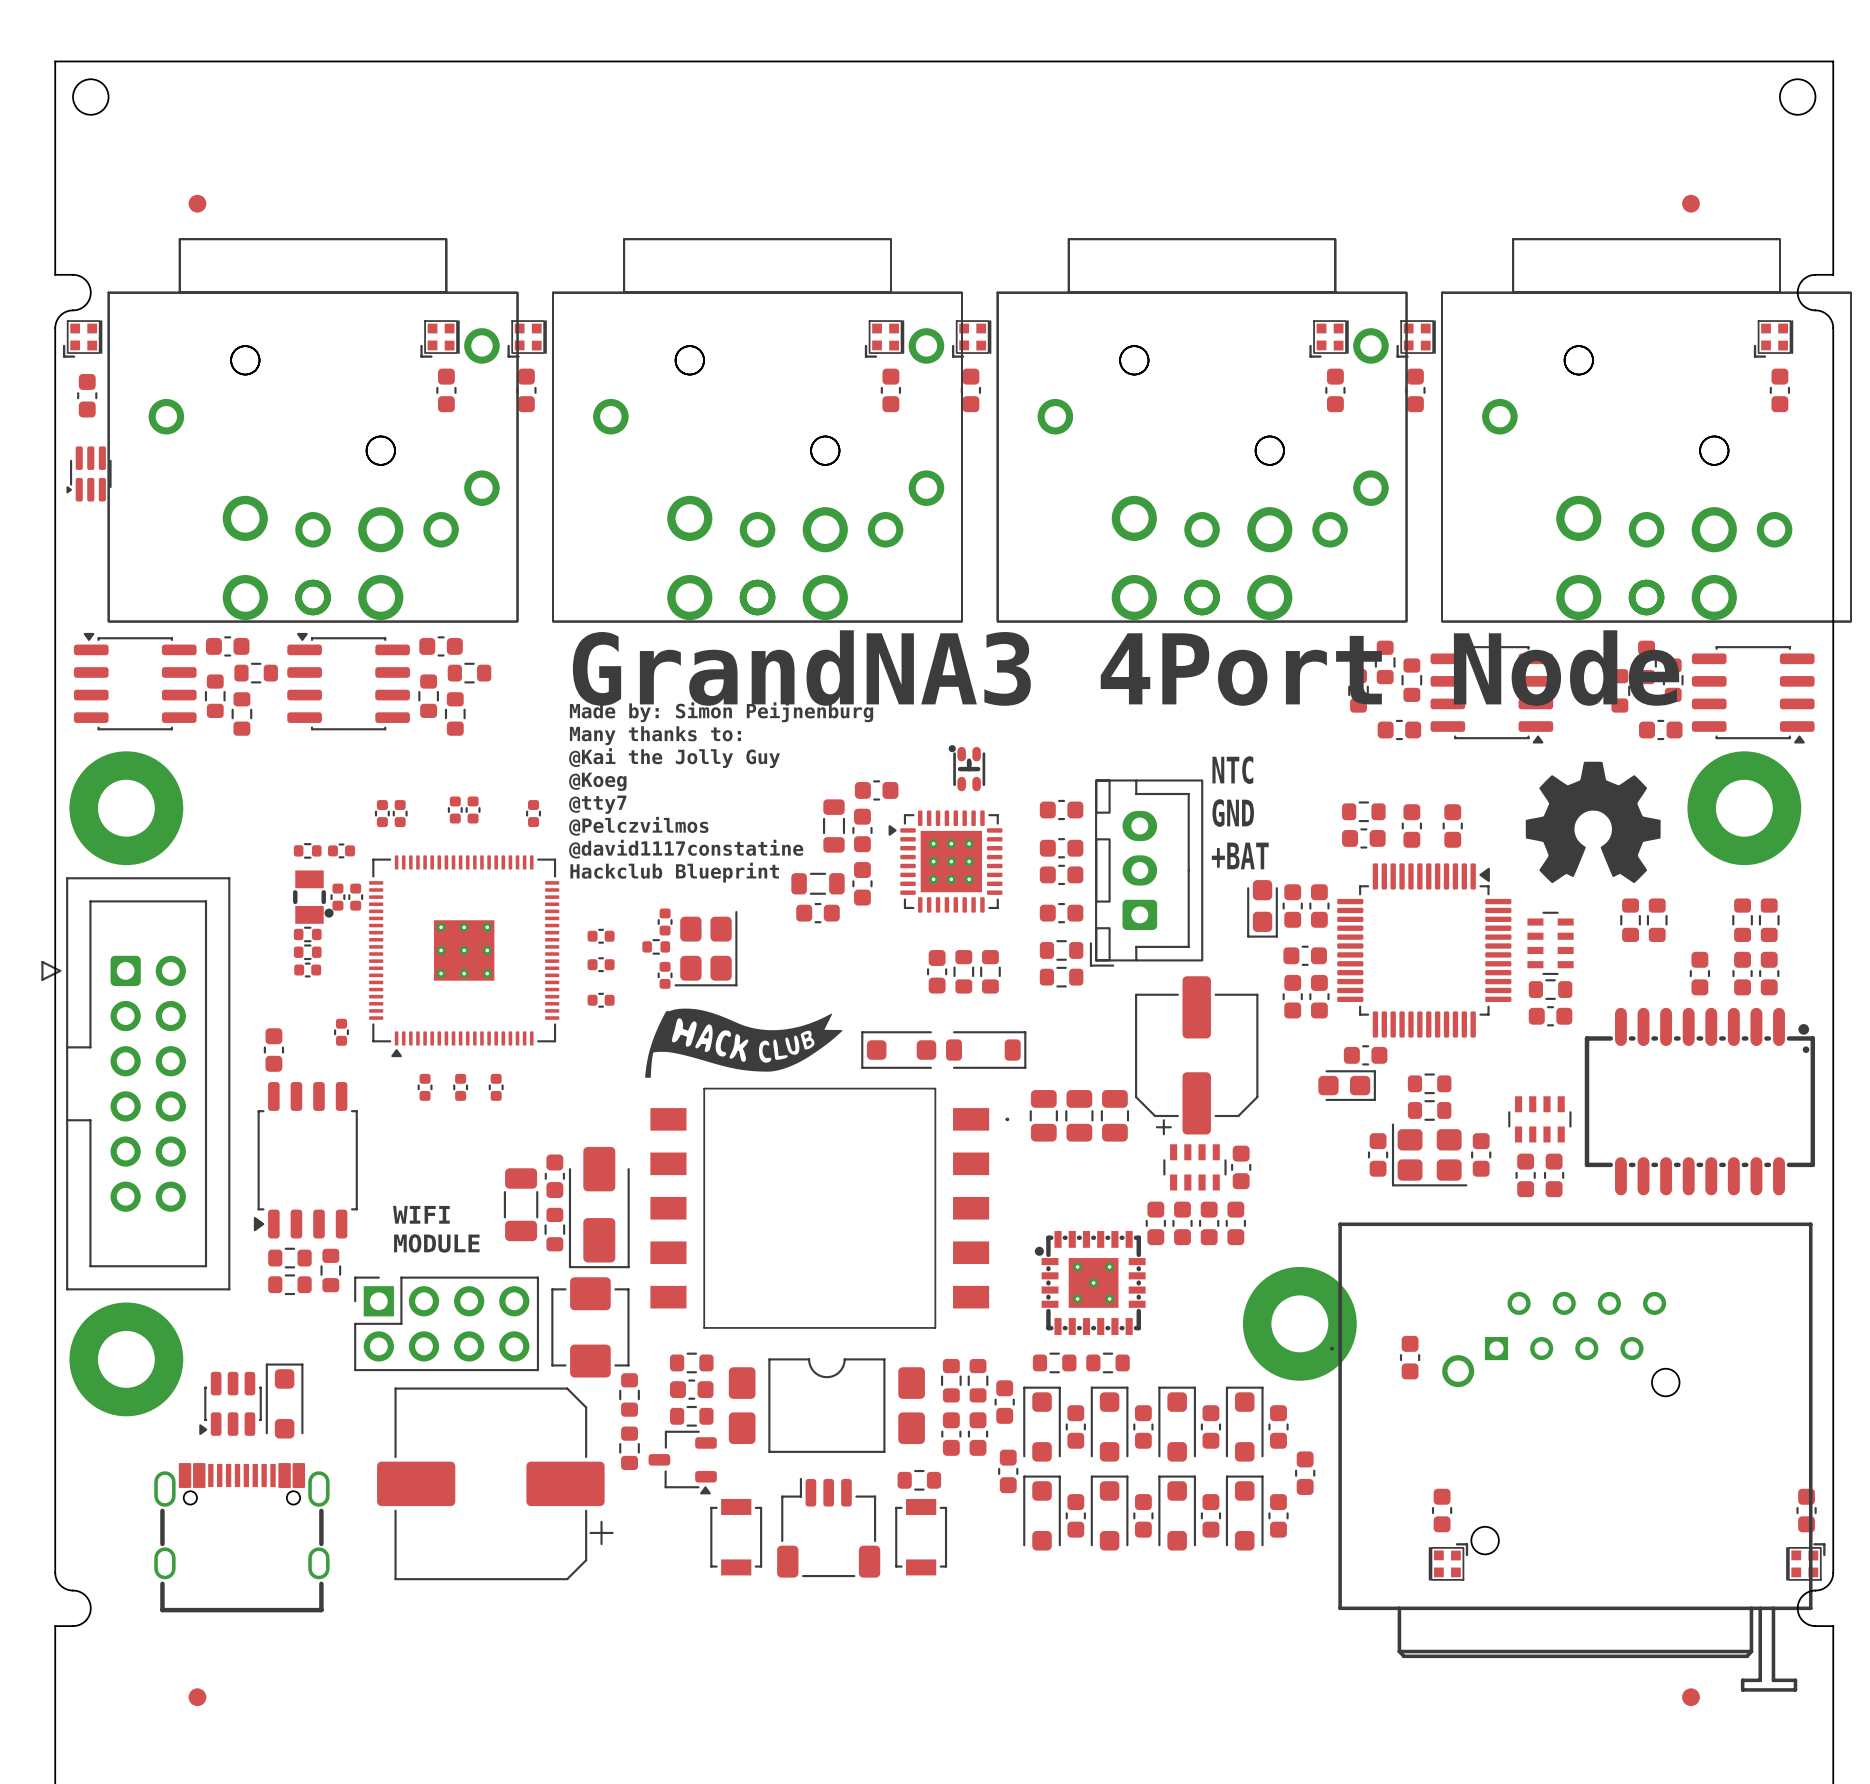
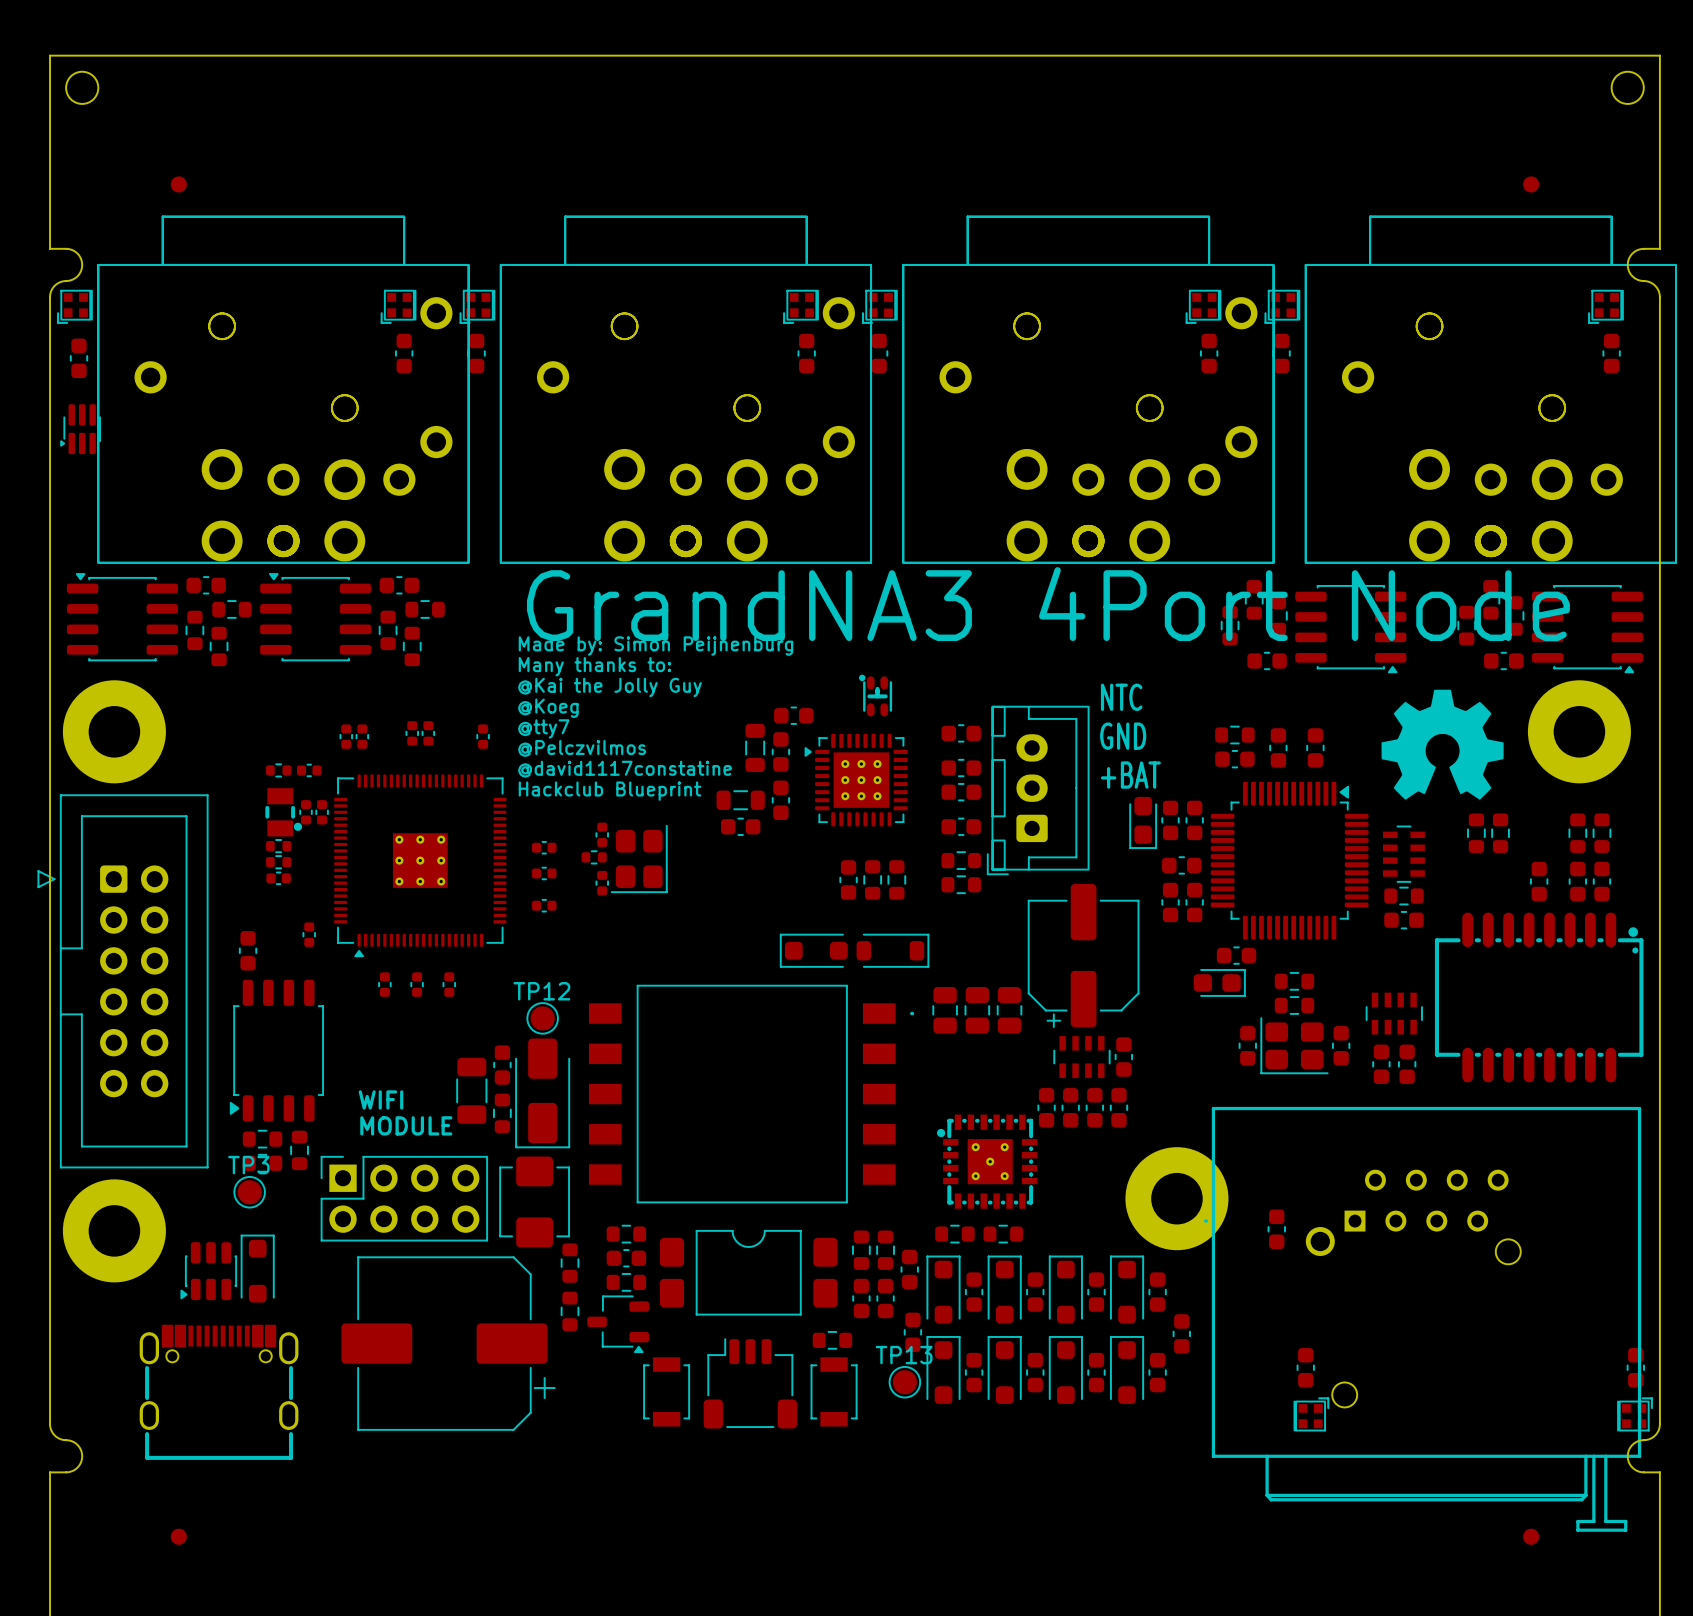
drawing: [645, 1008, 843, 1078] -> none
TP12: none -> (542, 1018)
TP3: none -> (249, 1192)
TP13: none -> (904, 1382)

